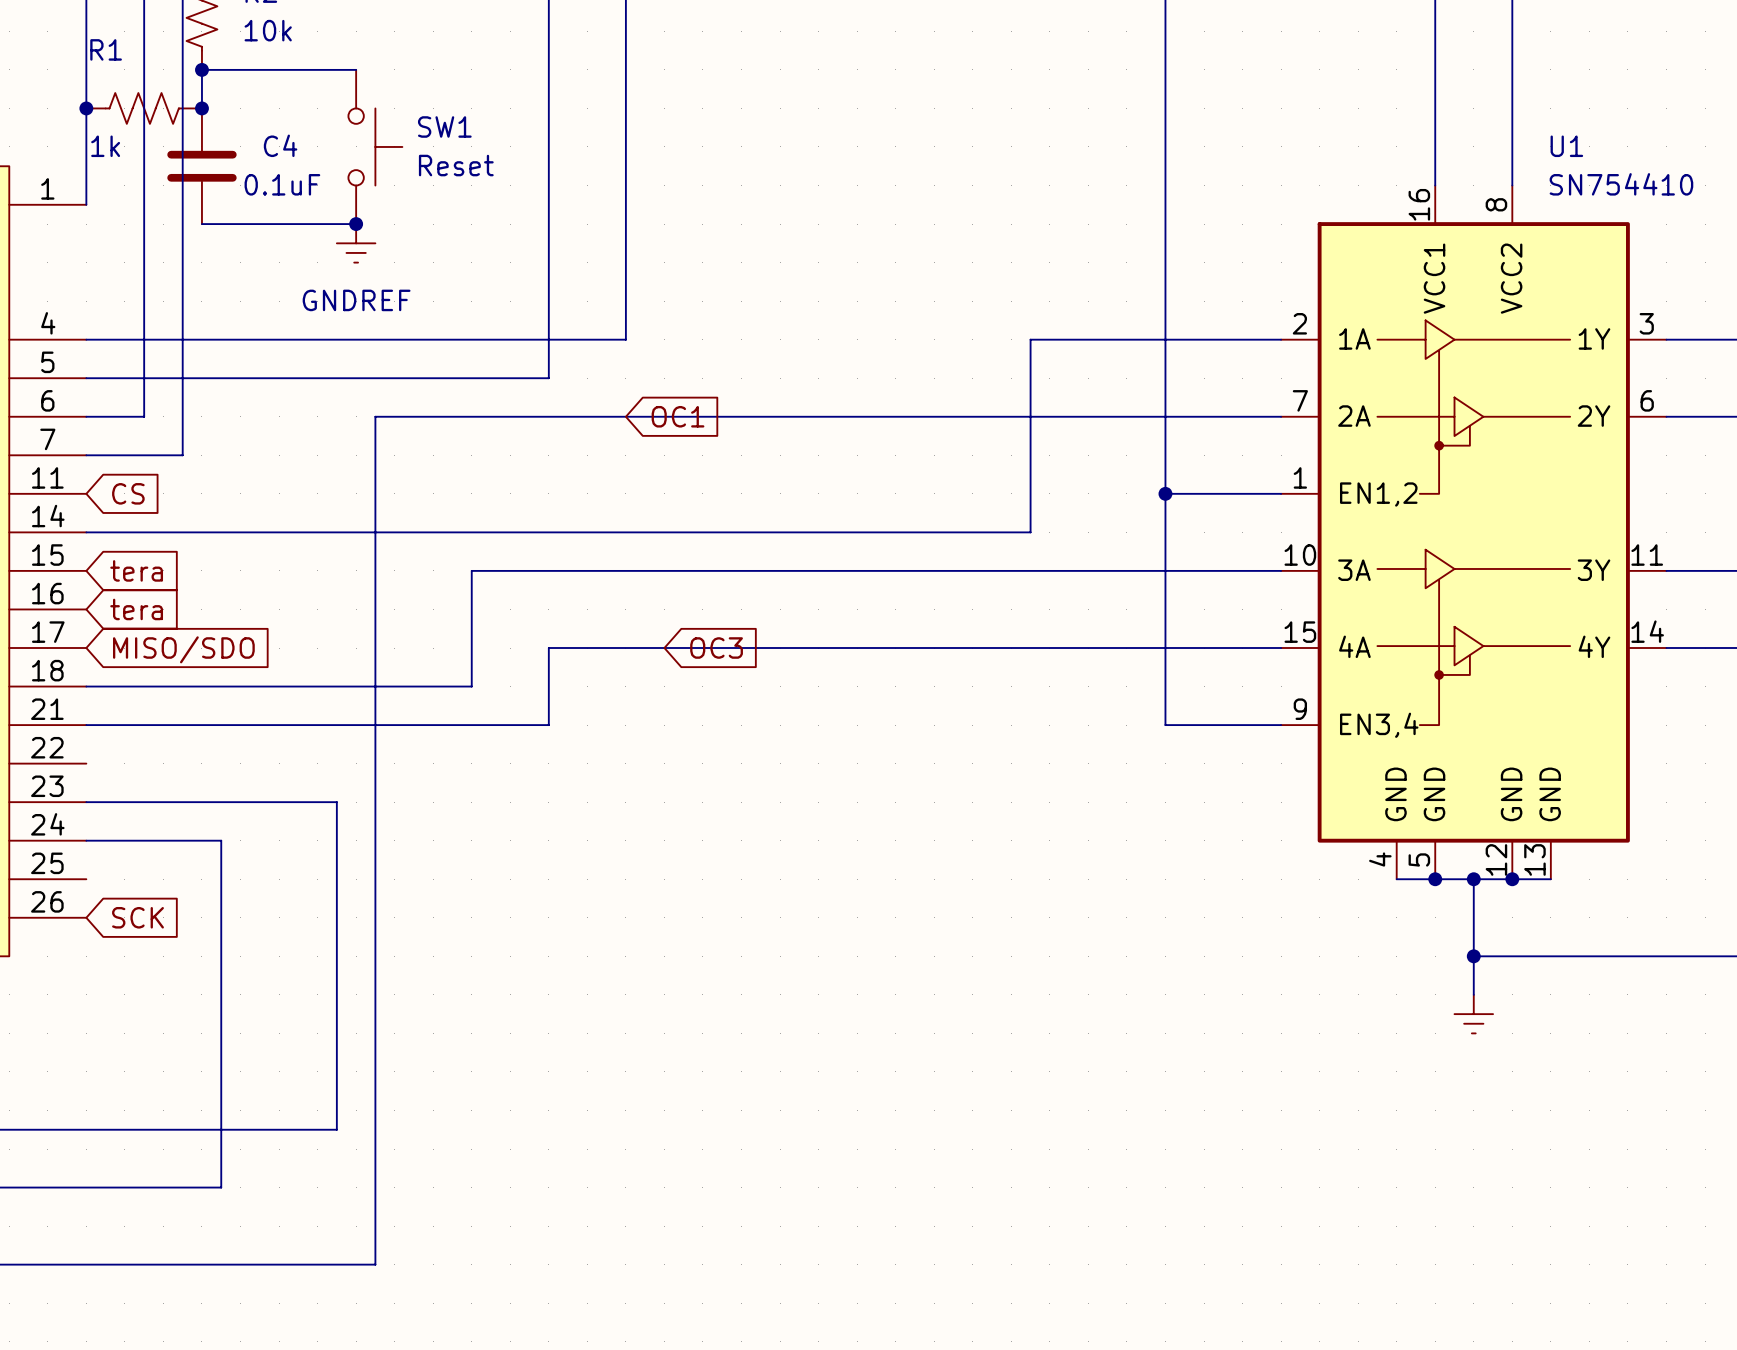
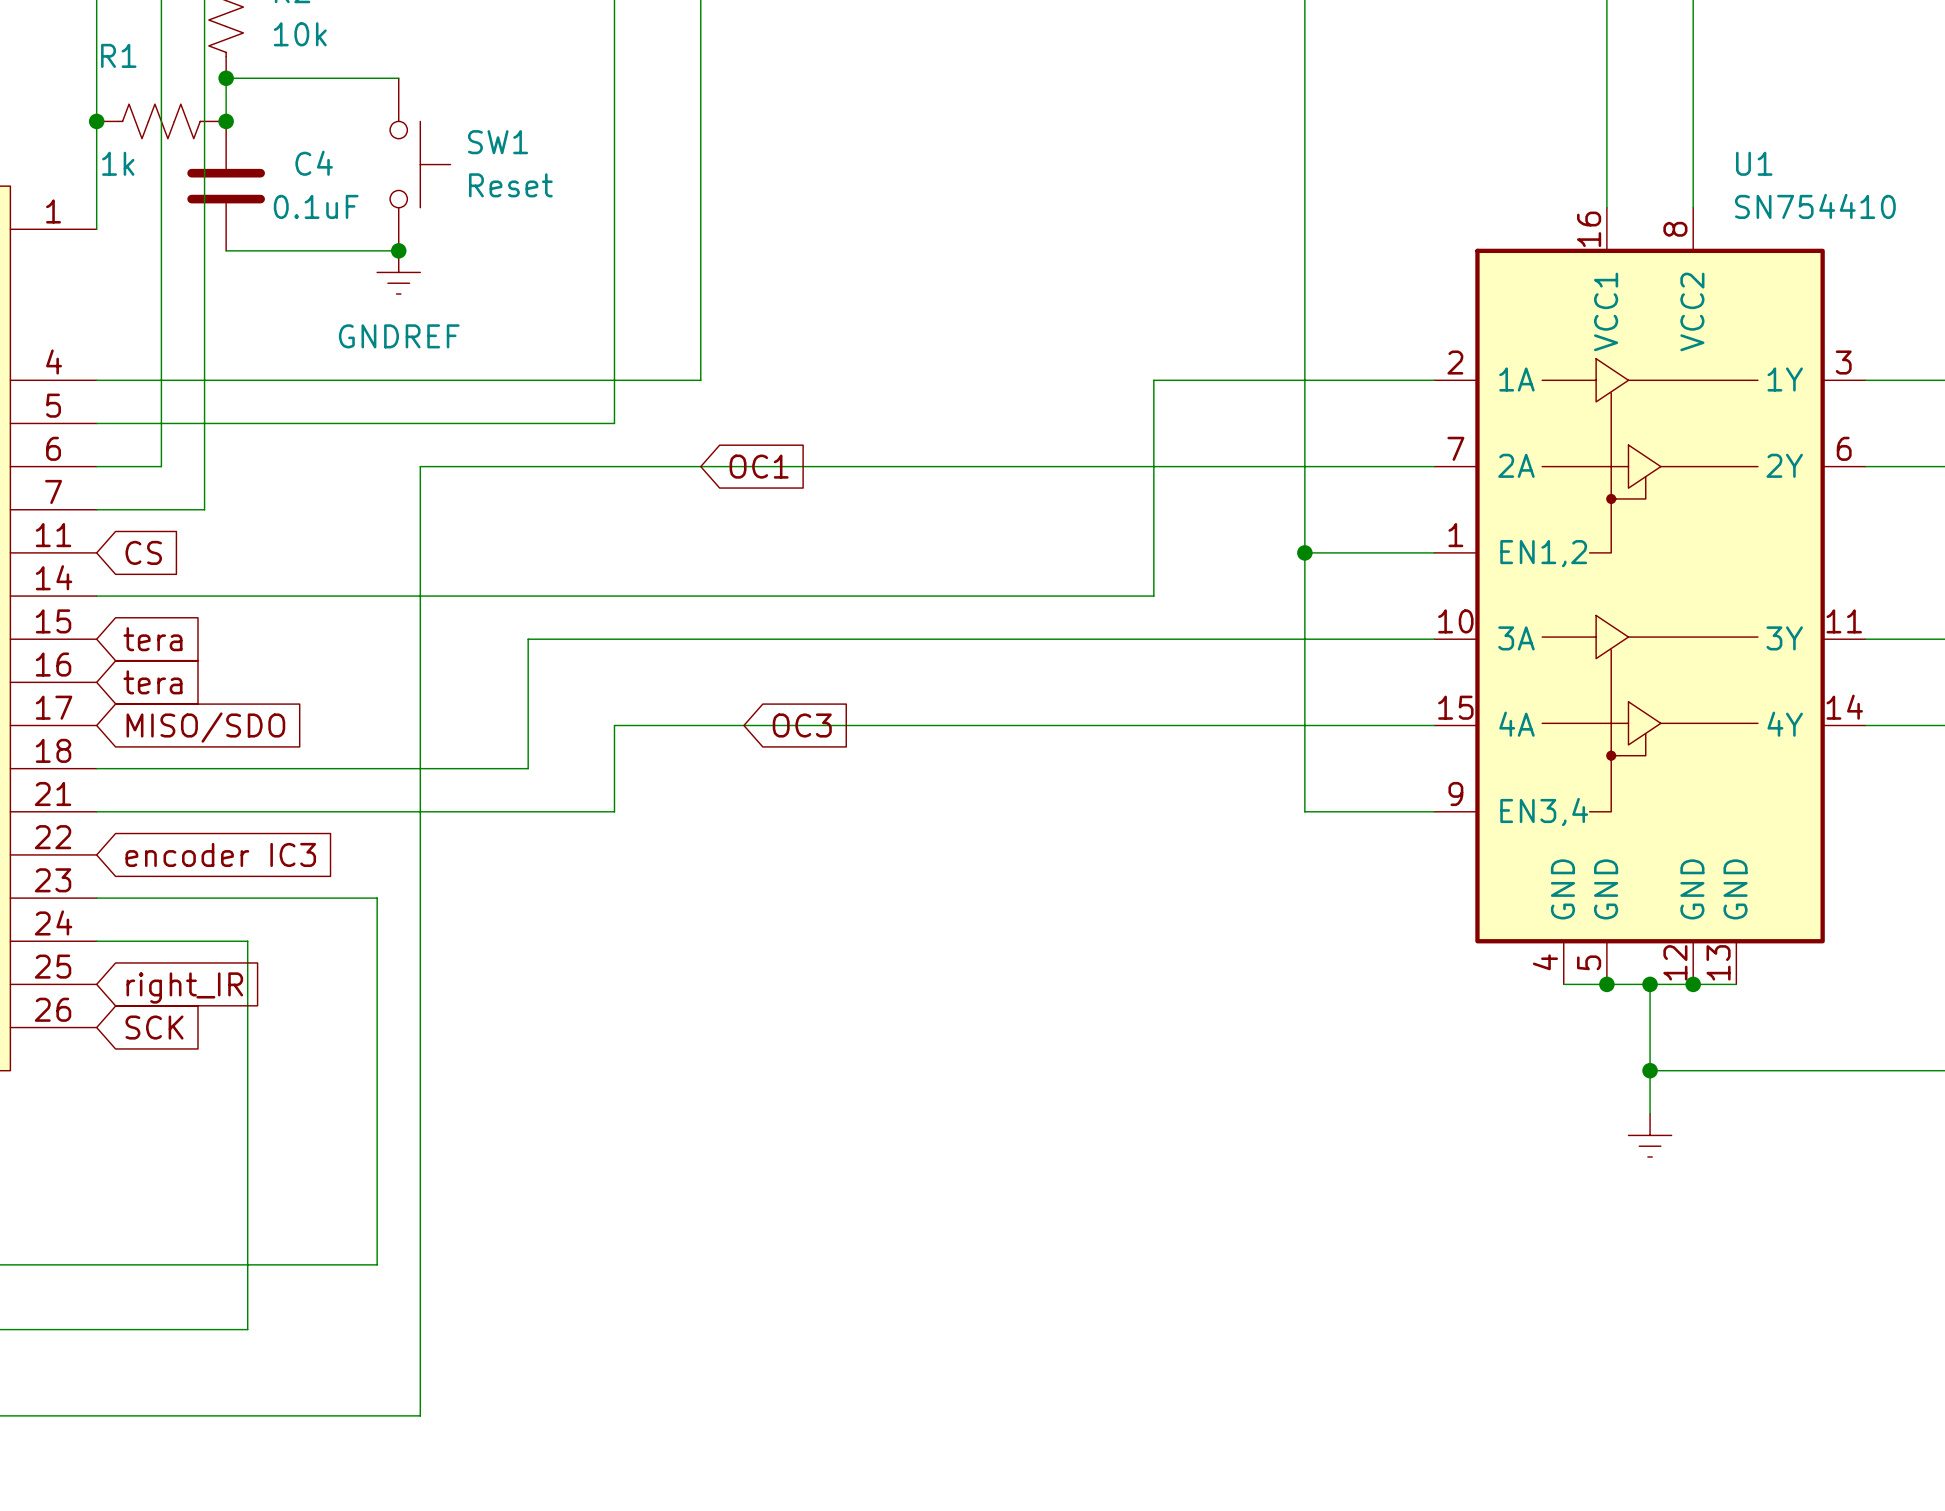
global label: none -> encoder IC3 (220, 854)
global label: none -> right_IR (184, 987)

